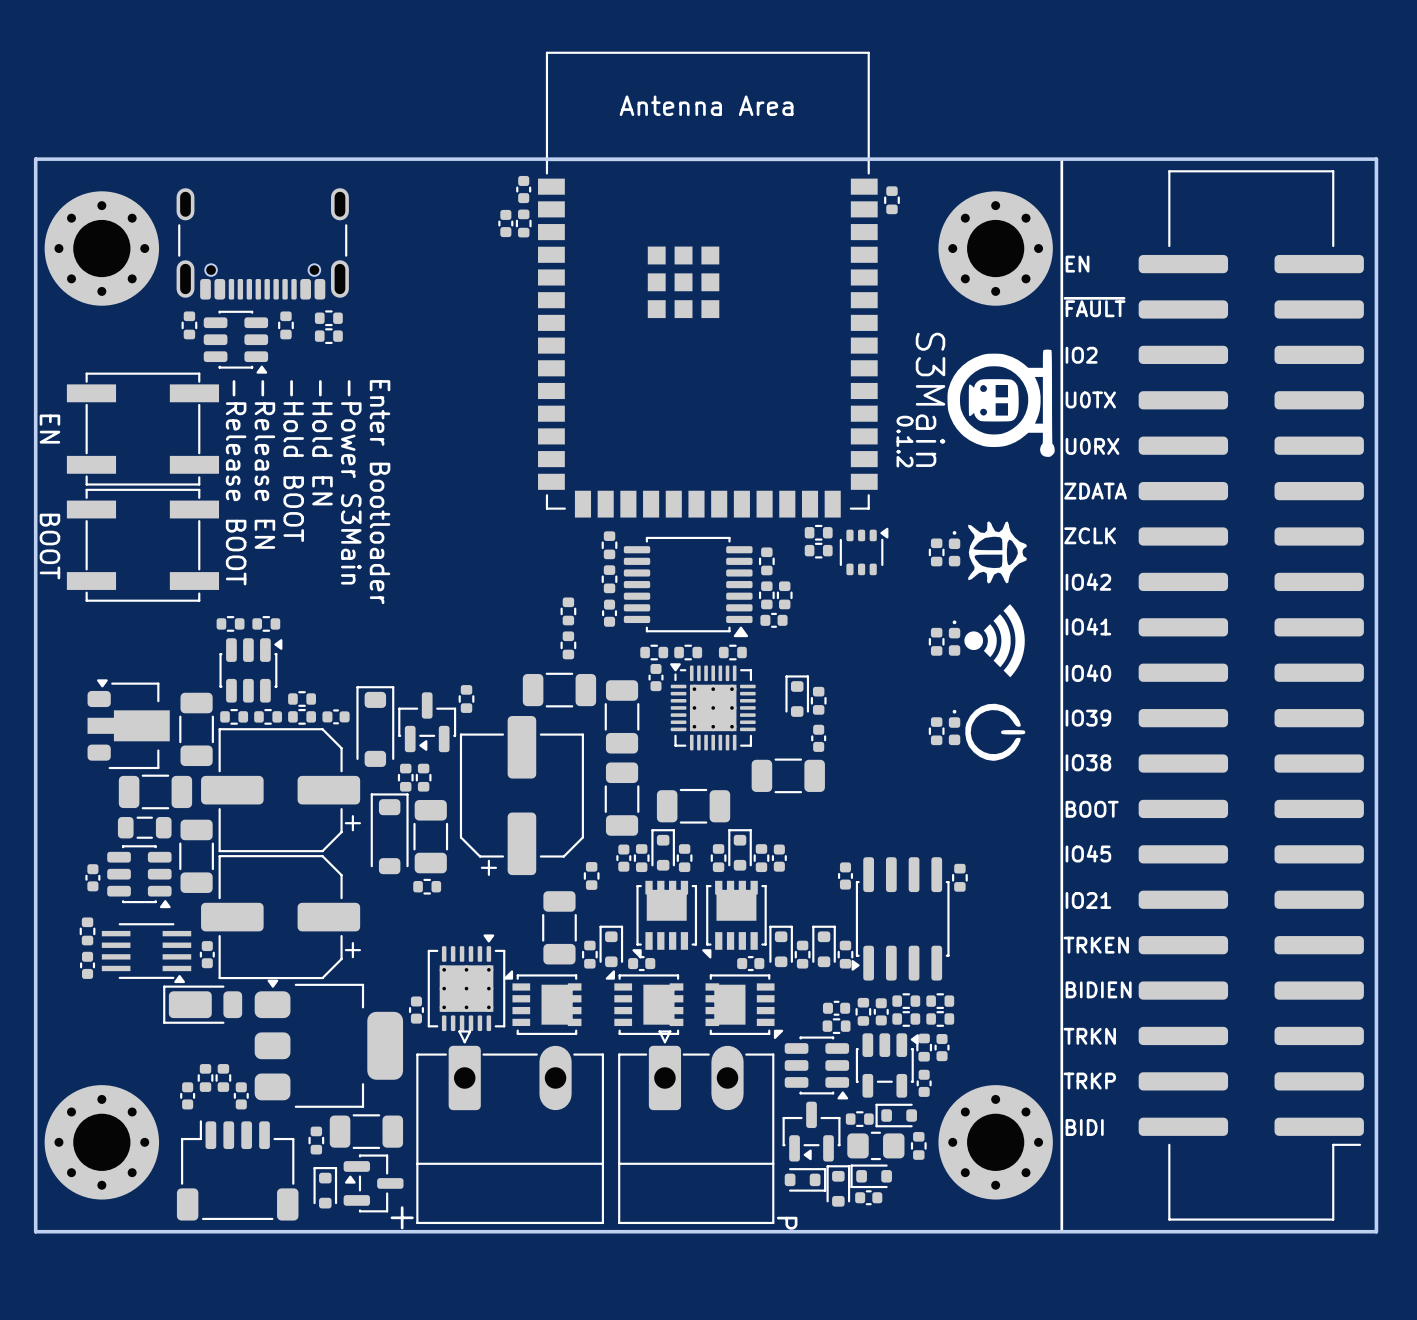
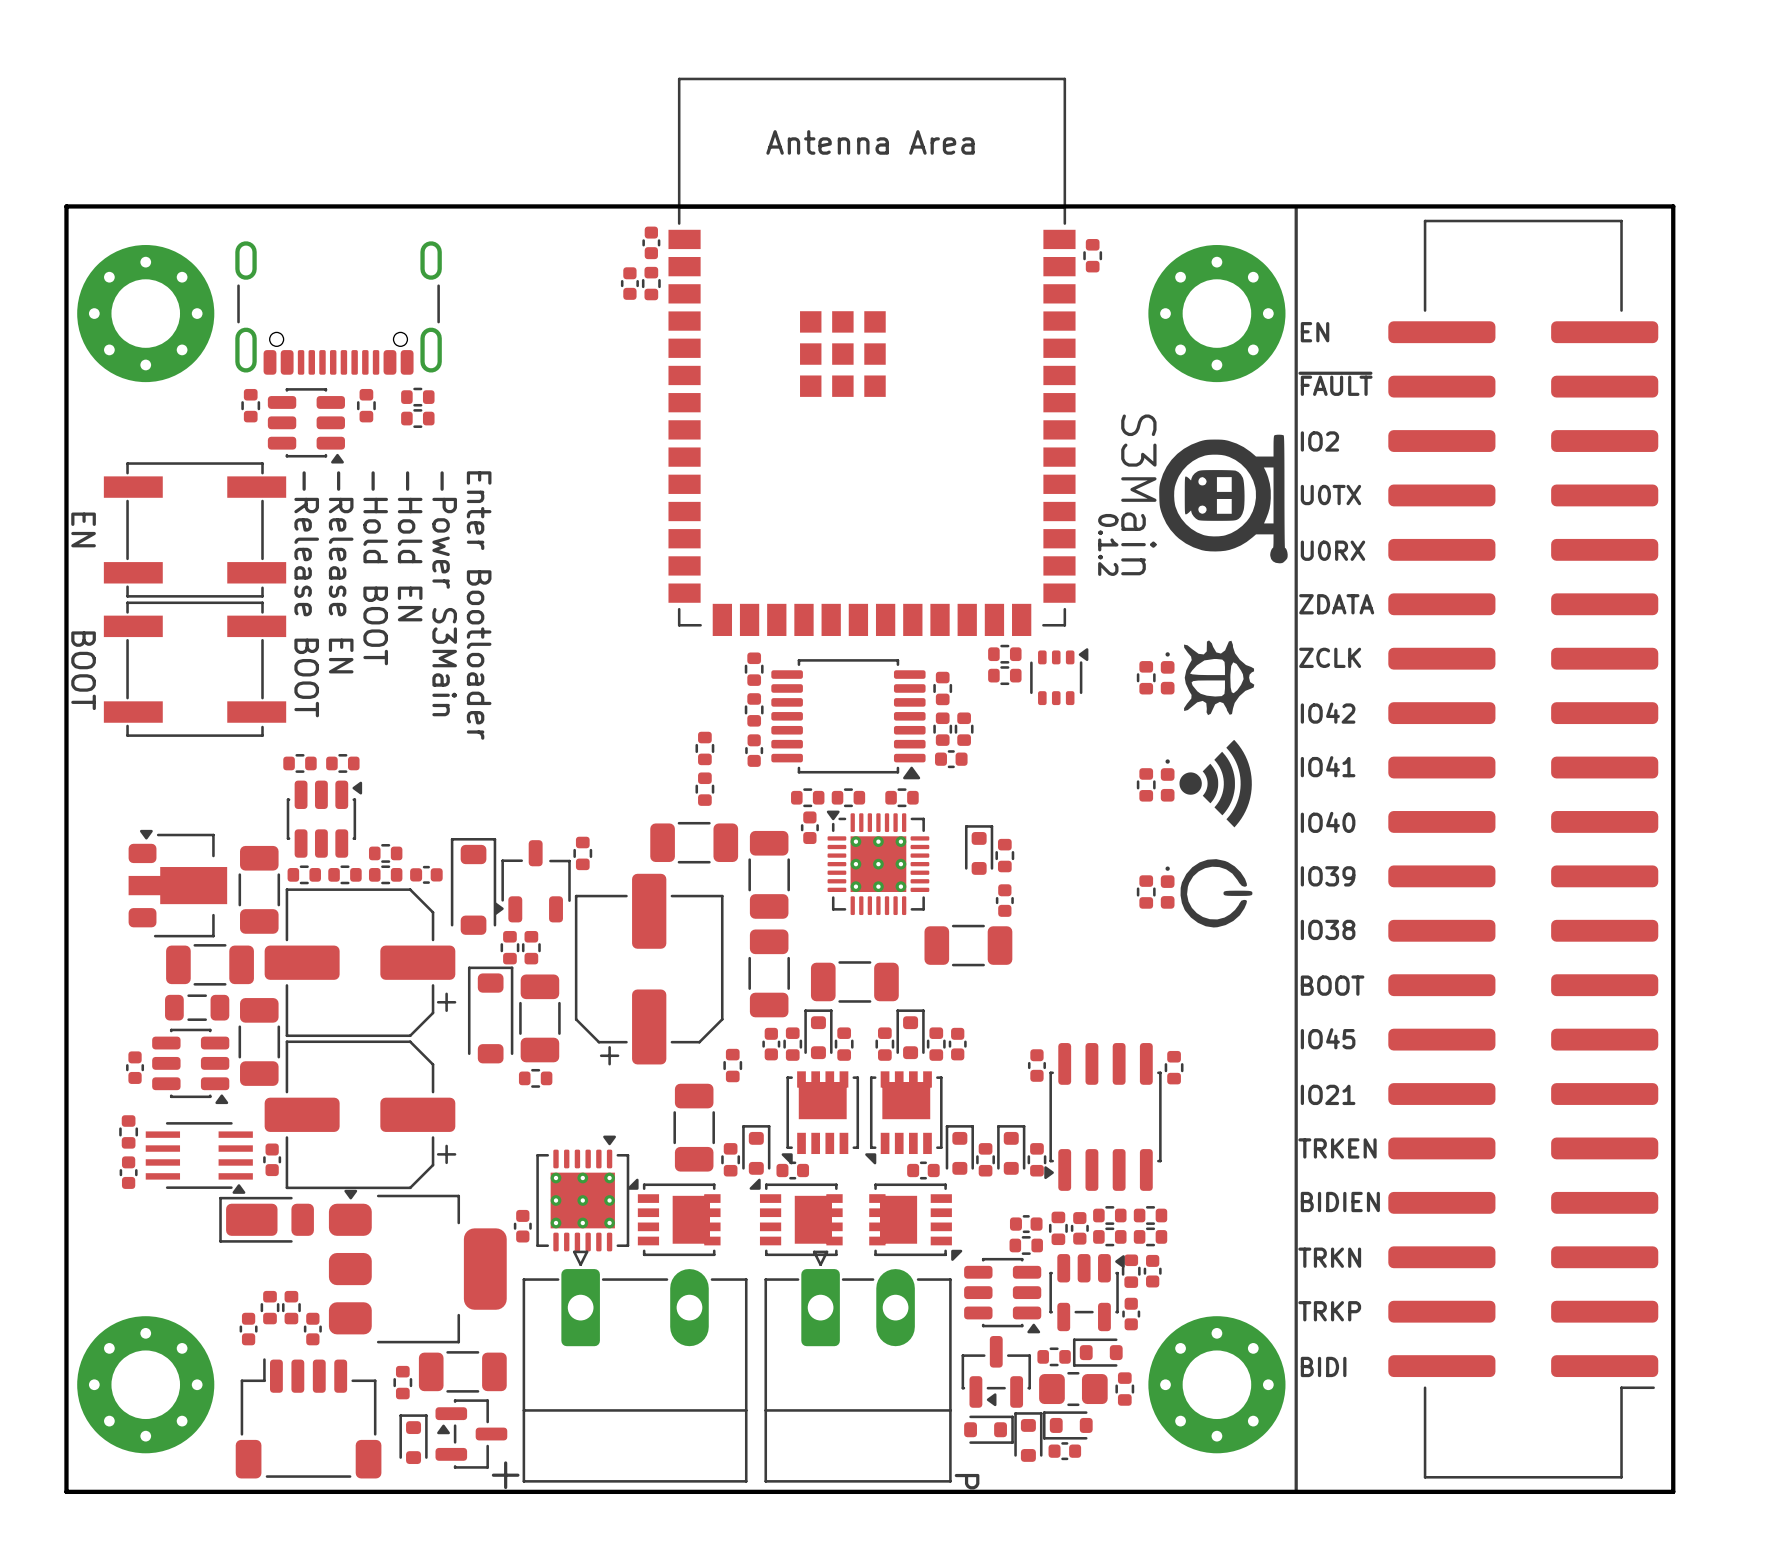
part footprint: [398, 692, 457, 753] -> [494, 840, 571, 923]

